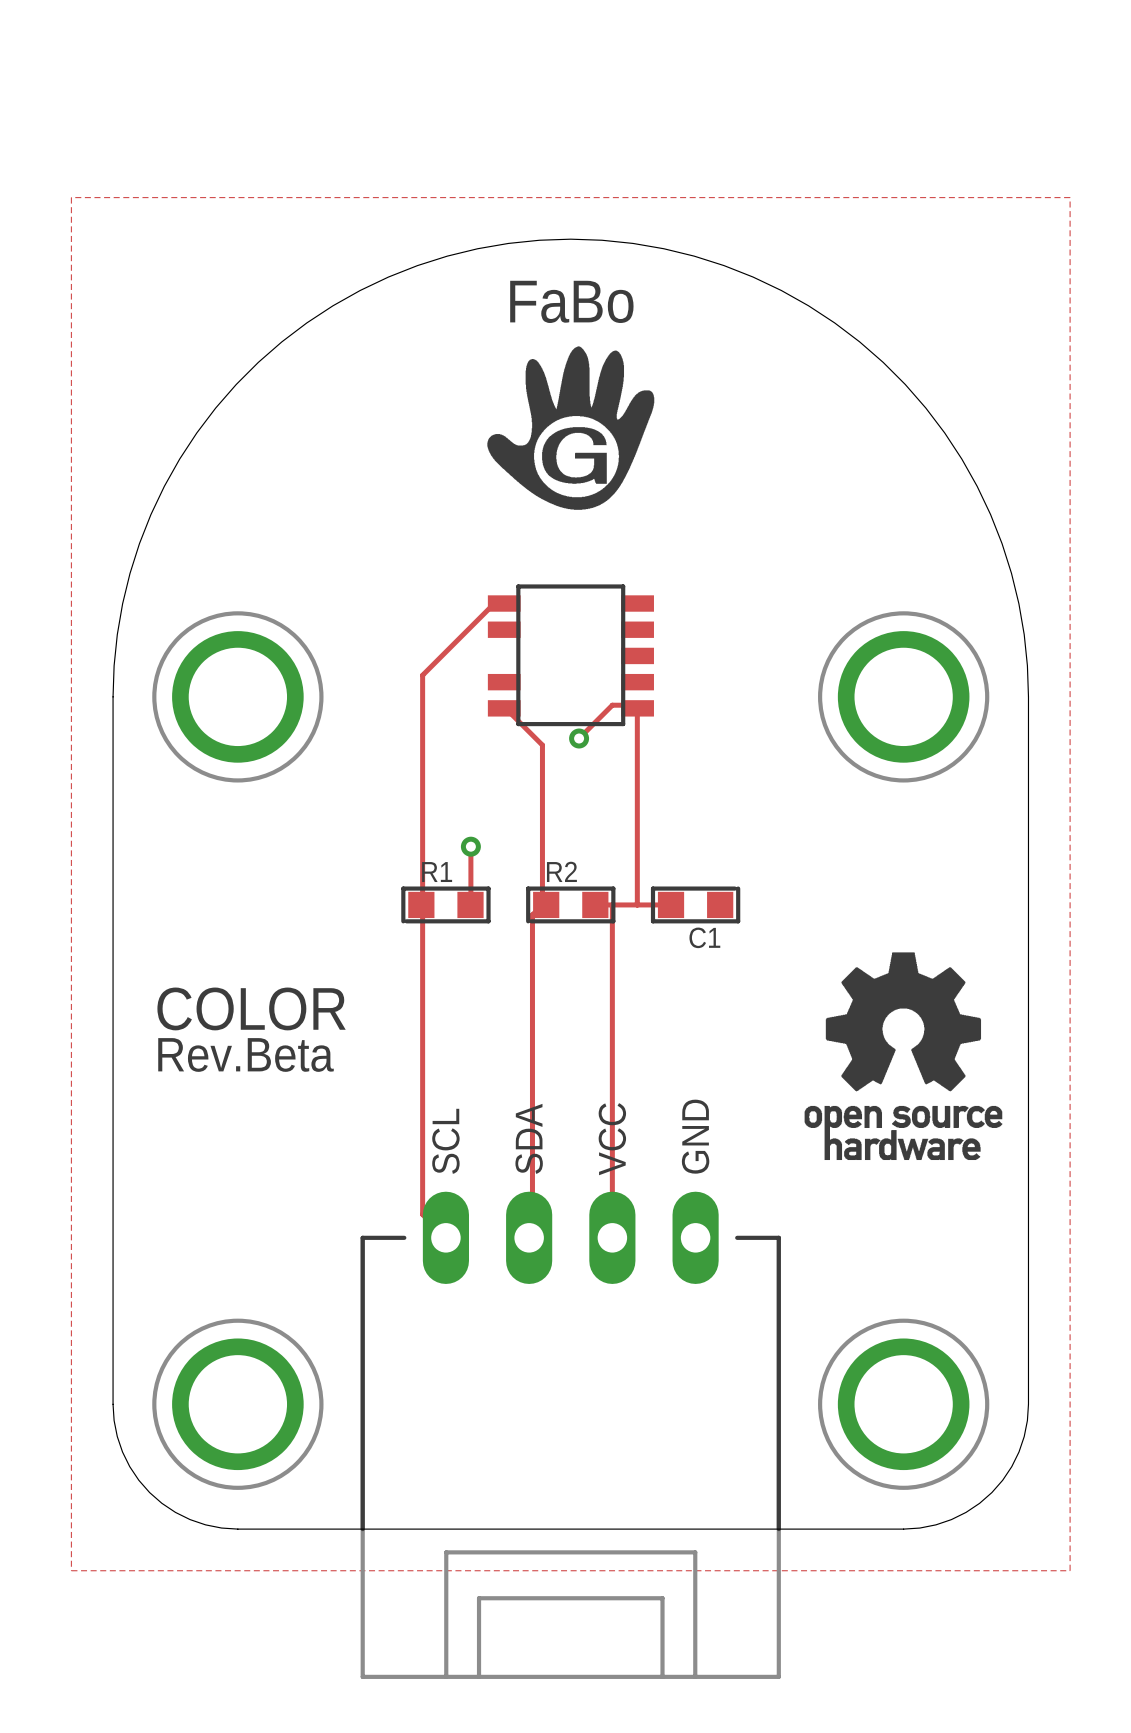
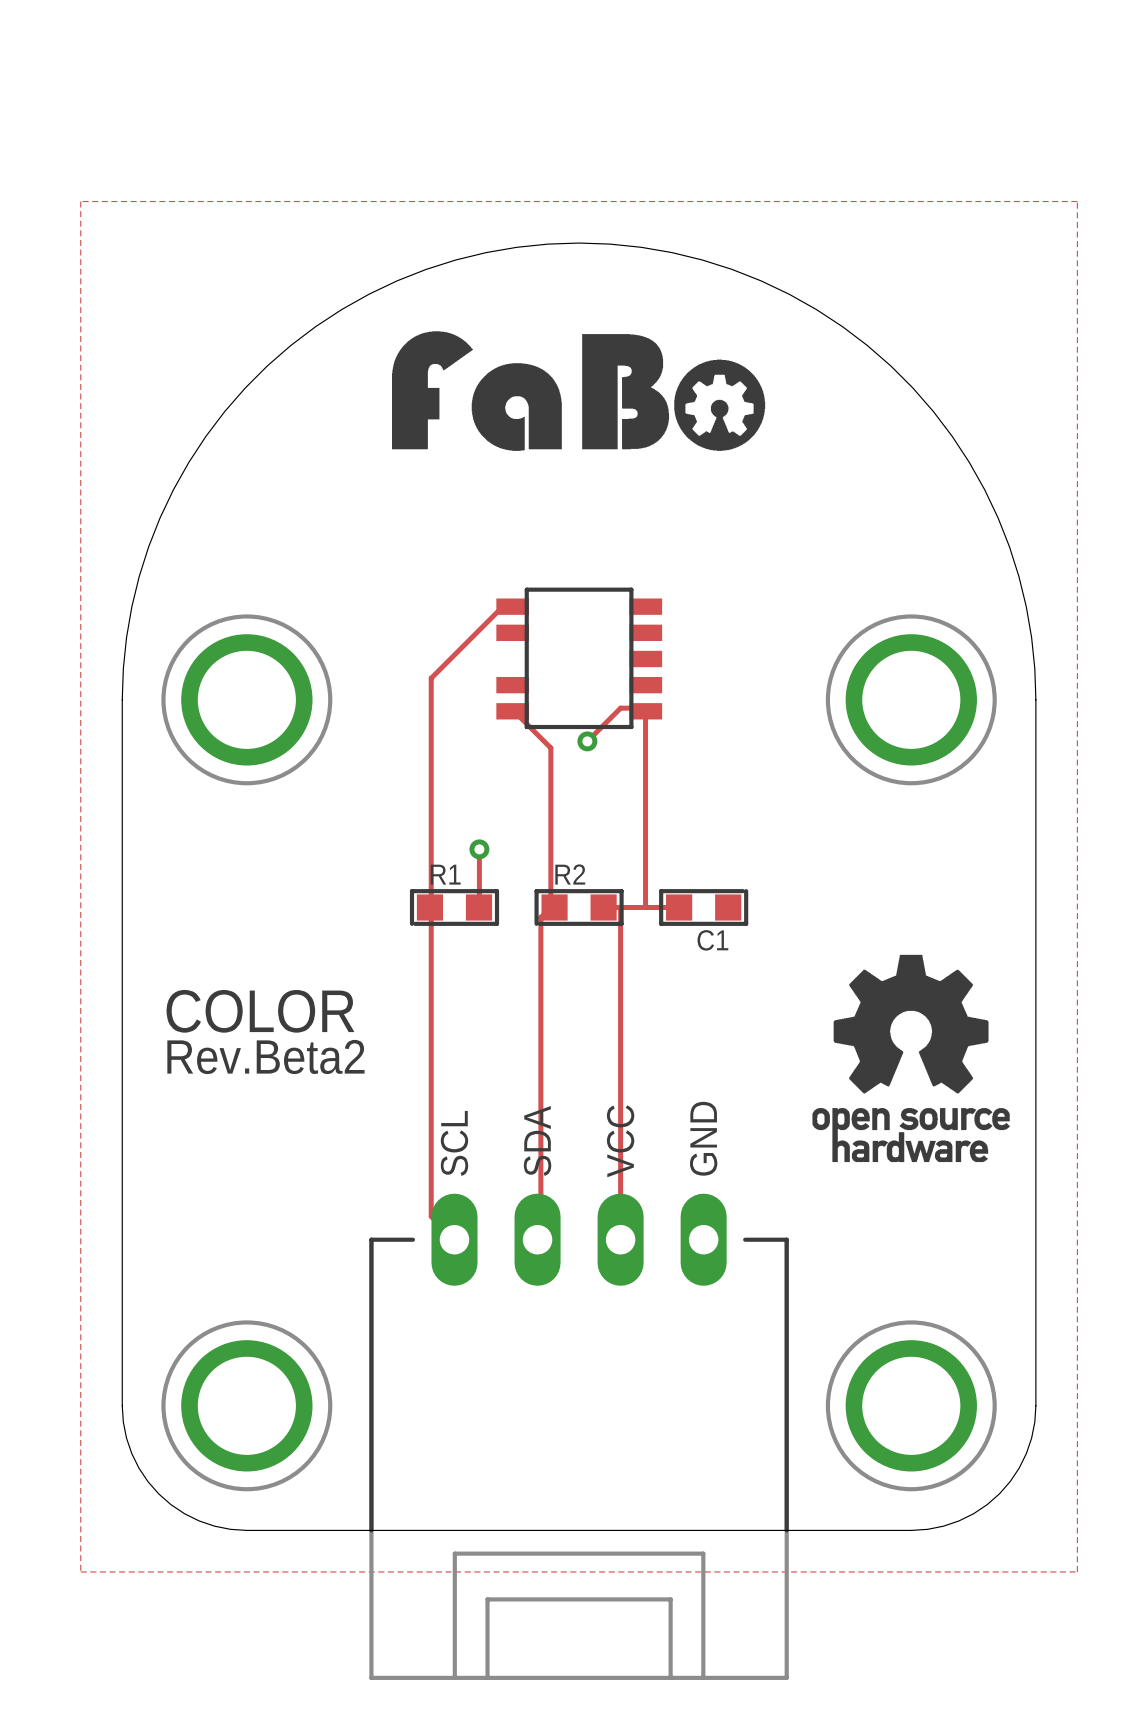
drawing: none -> [392, 331, 766, 451]
drawing: [487, 346, 655, 510] -> none
text: Rev.Beta (246, 1054) -> Rev.Beta2 (265, 1056)

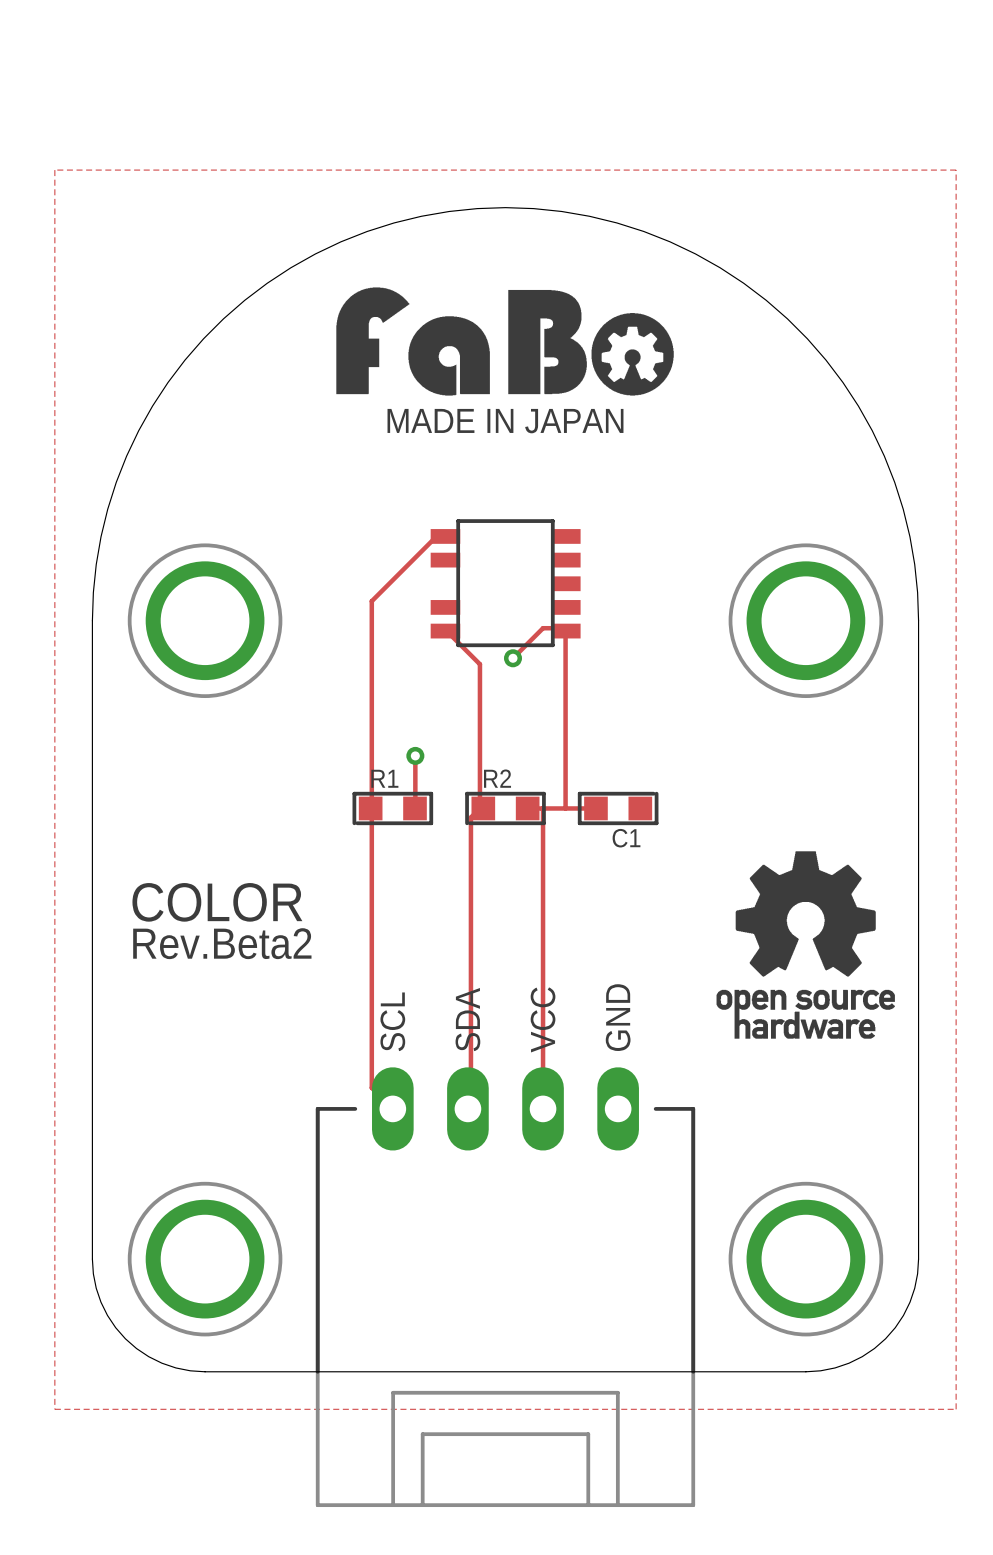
text: none -> MADE IN JAPAN (505, 421)

